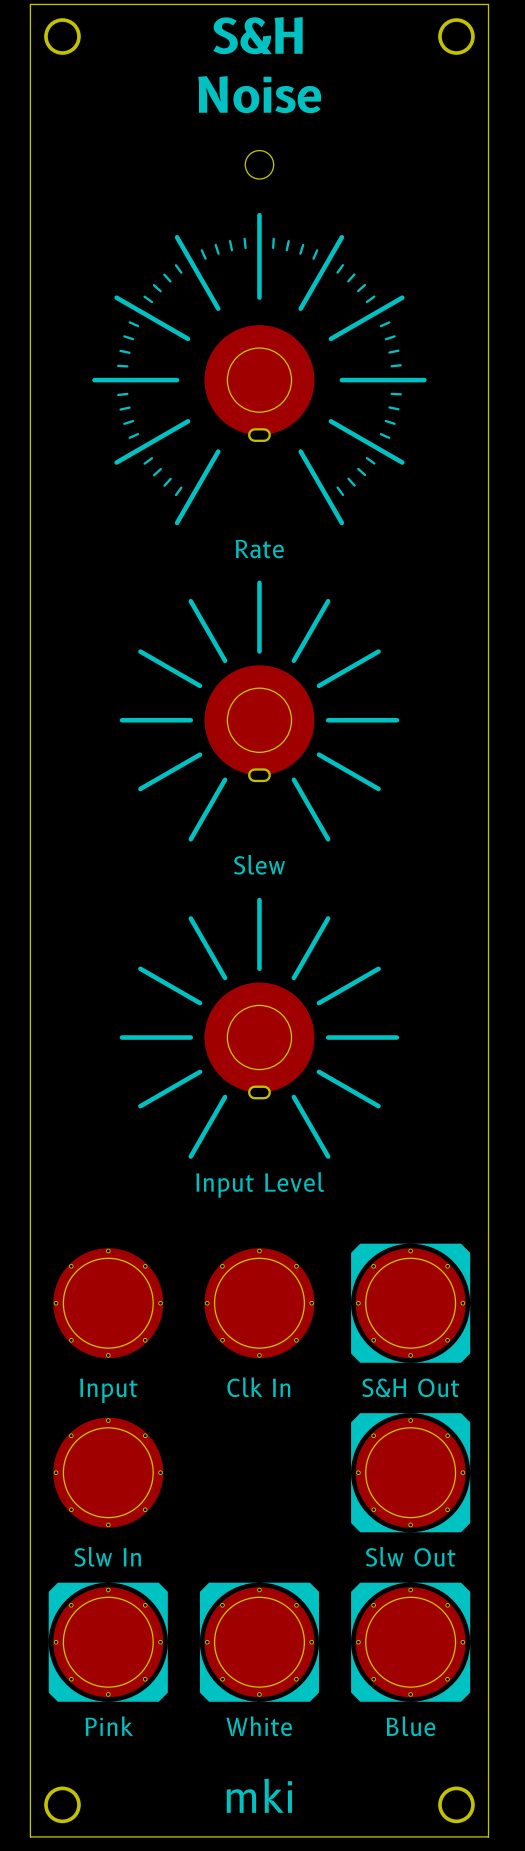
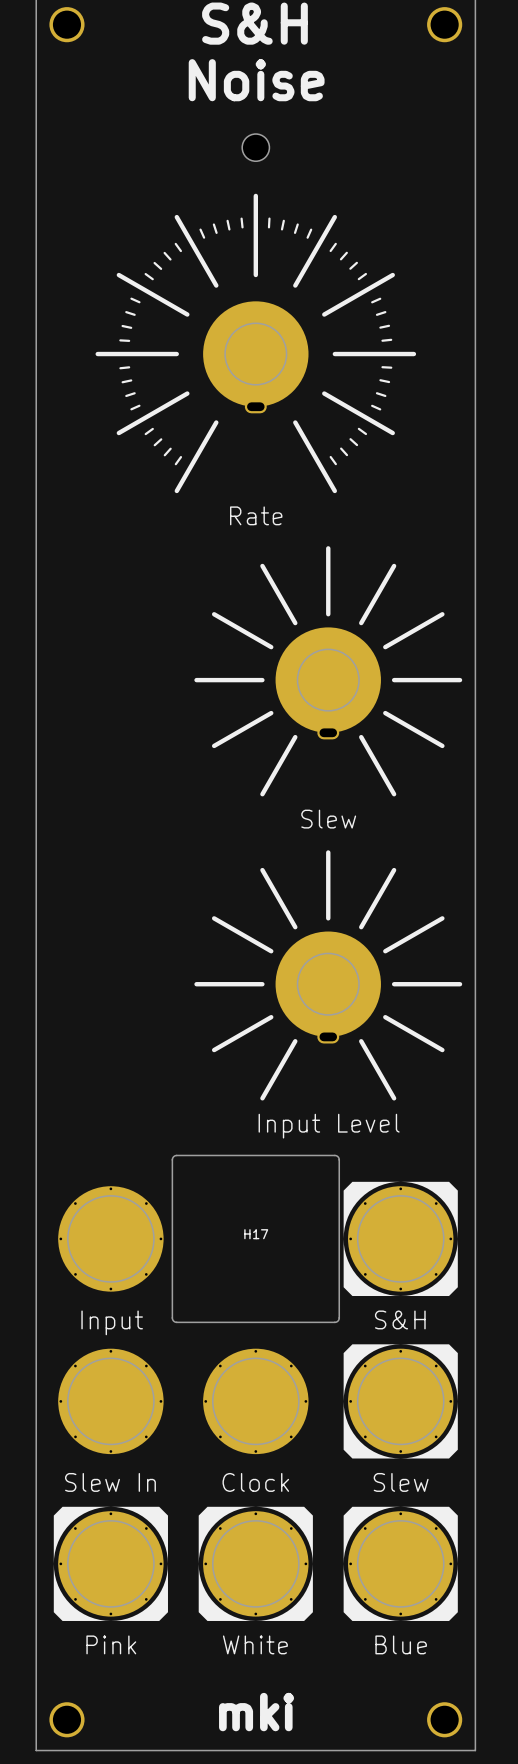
part position: (259, 711) -> (328, 671)
part position: (259, 1028) -> (328, 975)
part: Clk In (259, 1303) -> none
H17: none -> (255, 1238)
part value: S&H Out (410, 1387) -> S&H (400, 1319)
part: none -> Clock (255, 1401)
part value: Slw In (107, 1556) -> Slew In (110, 1482)
part value: Slw Out (410, 1556) -> Slew (401, 1482)

